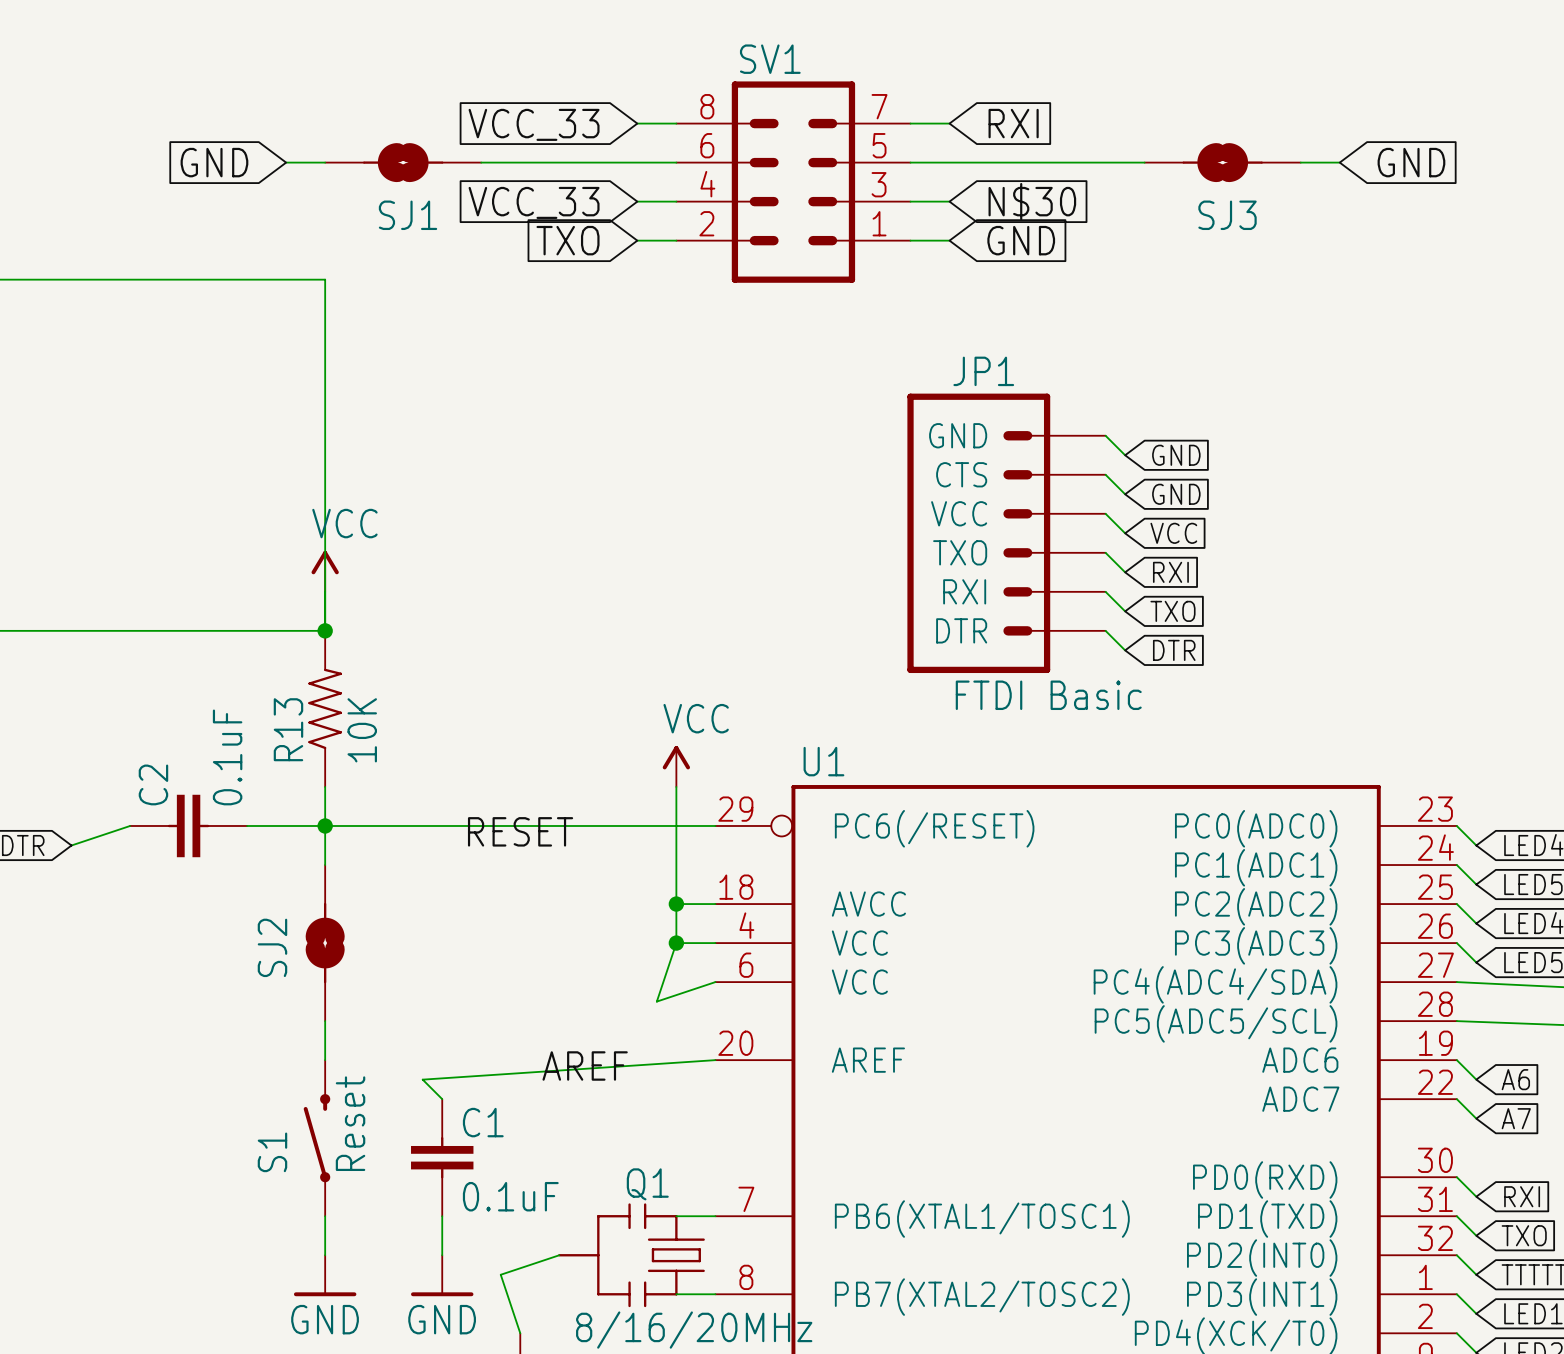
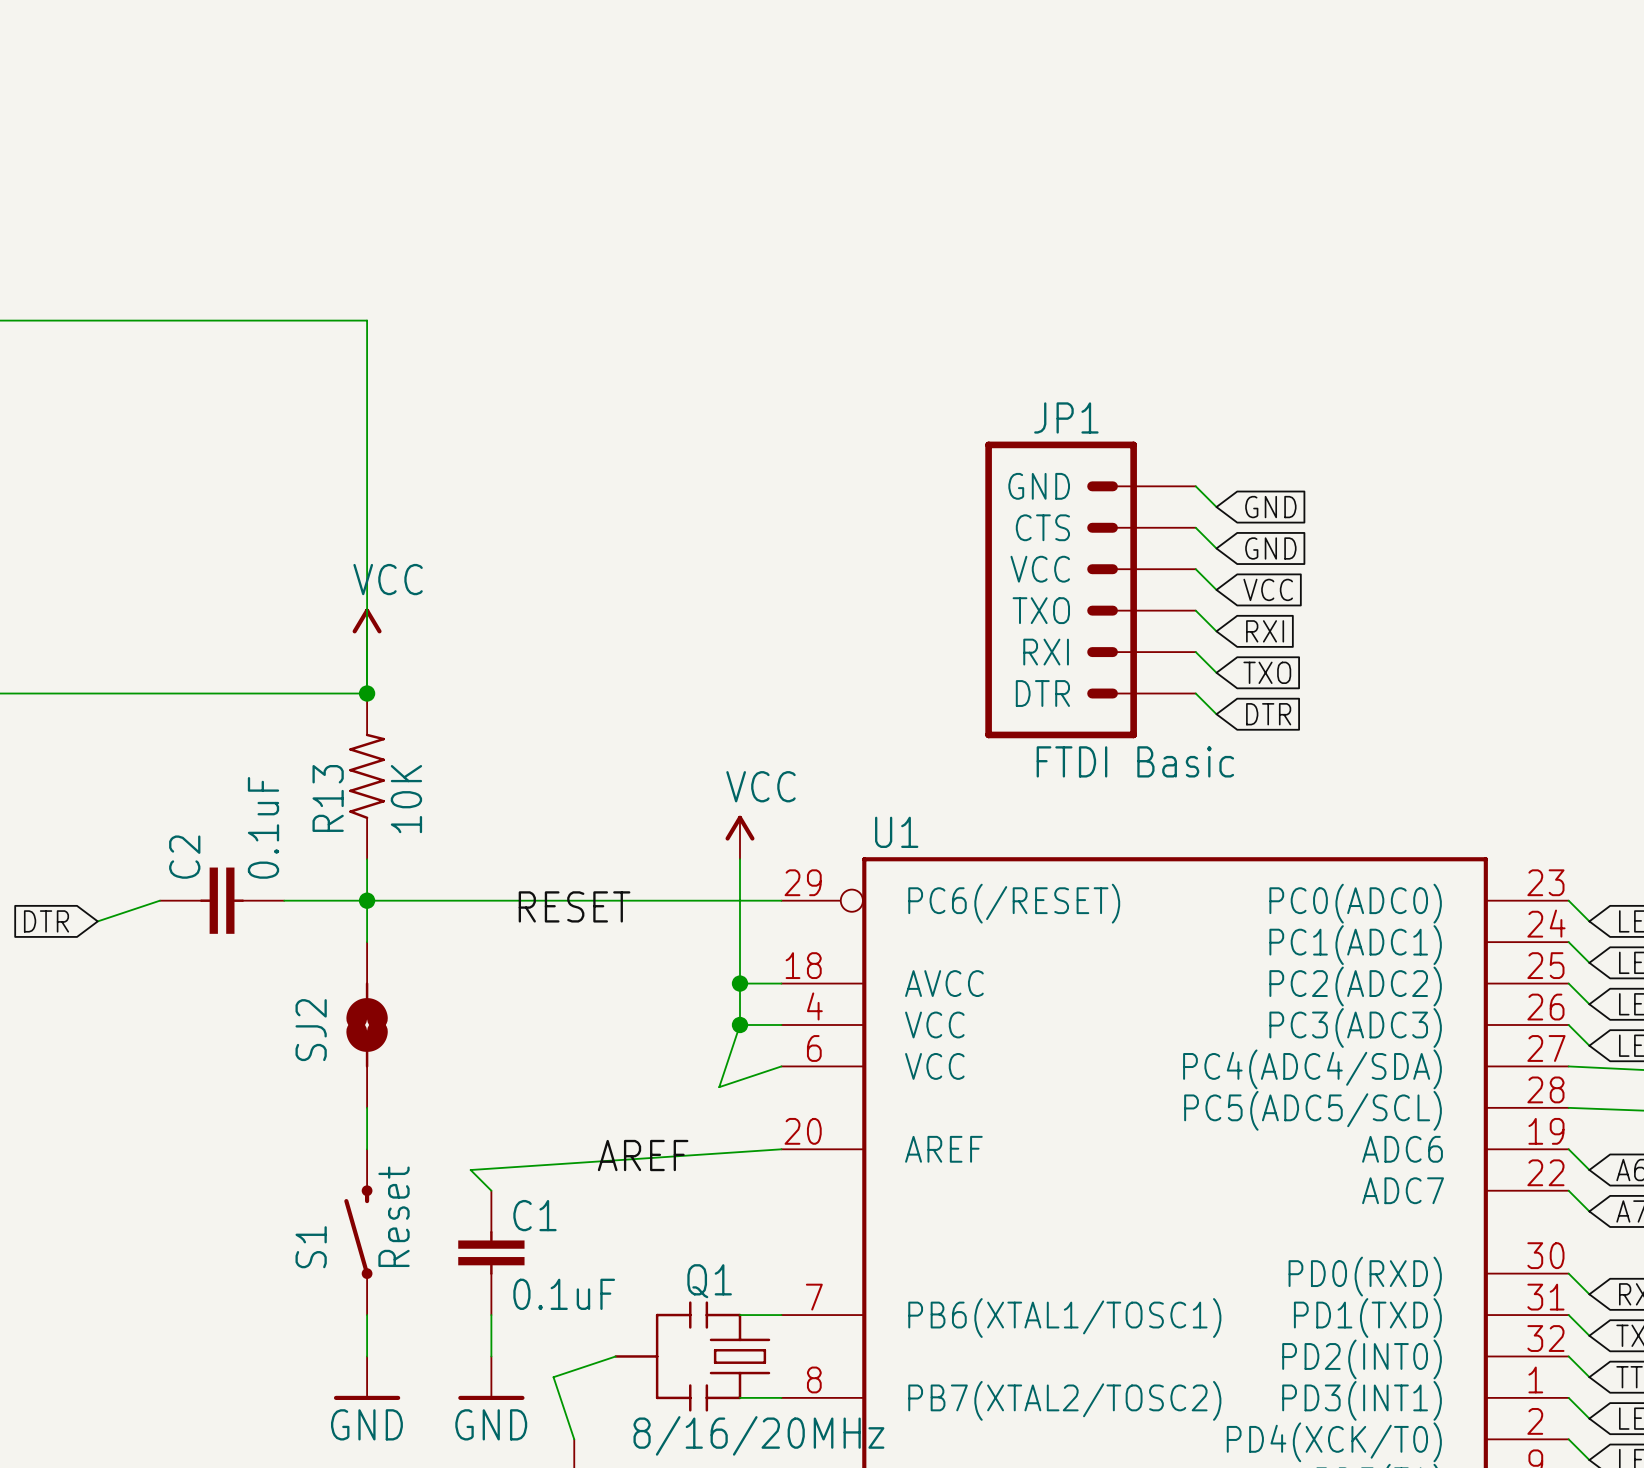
wire: (637, 123) (676, 123) -> none
wire: (910, 123) (949, 123) -> none
global label: RXI (1013, 123) -> none
global label: VCC_33 (534, 124) -> none
global label: GND (214, 162) -> none
wire: (286, 162) (325, 162) -> none
SJ1: (403, 162) -> none
wire: (481, 162) (676, 162) -> none
wire: (910, 162) (1144, 162) -> none
SJ3: (1222, 162) -> none
wire: (1300, 162) (1339, 162) -> none
global label: GND (1411, 162) -> none
SV1: (793, 182) -> none
wire: (637, 201) (676, 201) -> none
wire: (910, 201) (949, 201) -> none
global label: N$30 (1032, 201) -> none
global label: VCC_33 (534, 202) -> none
global label: TXO (568, 240) -> none
wire: (637, 240) (676, 240) -> none
wire: (910, 240) (949, 240) -> none
global label: GND (1021, 240) -> none

